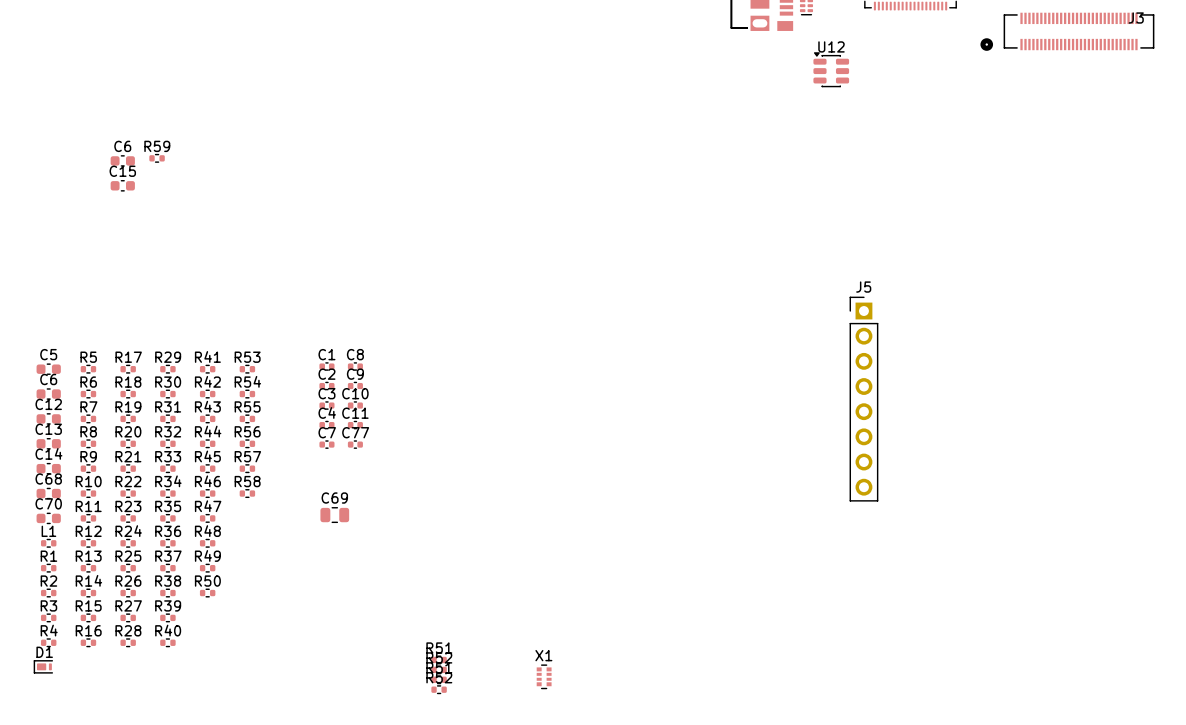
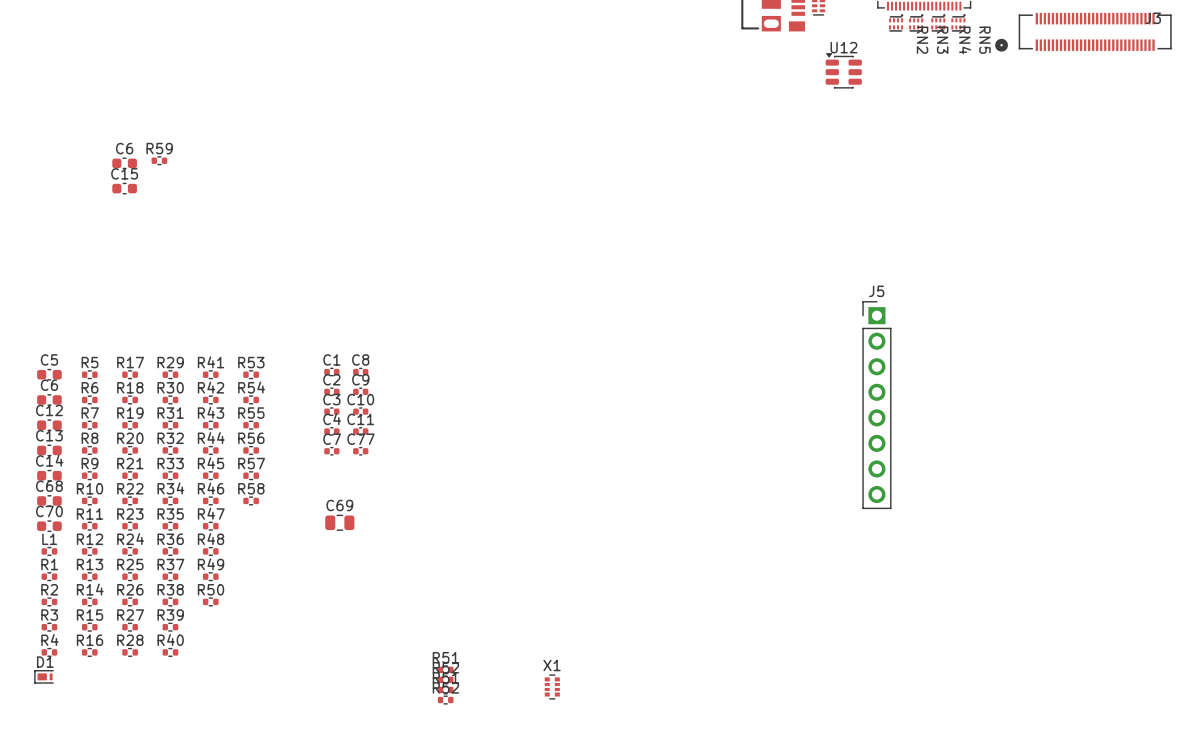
RN2: none -> (896, 22)
RN3: none -> (916, 22)
RN4: none -> (938, 22)
RN5: none -> (958, 22)

